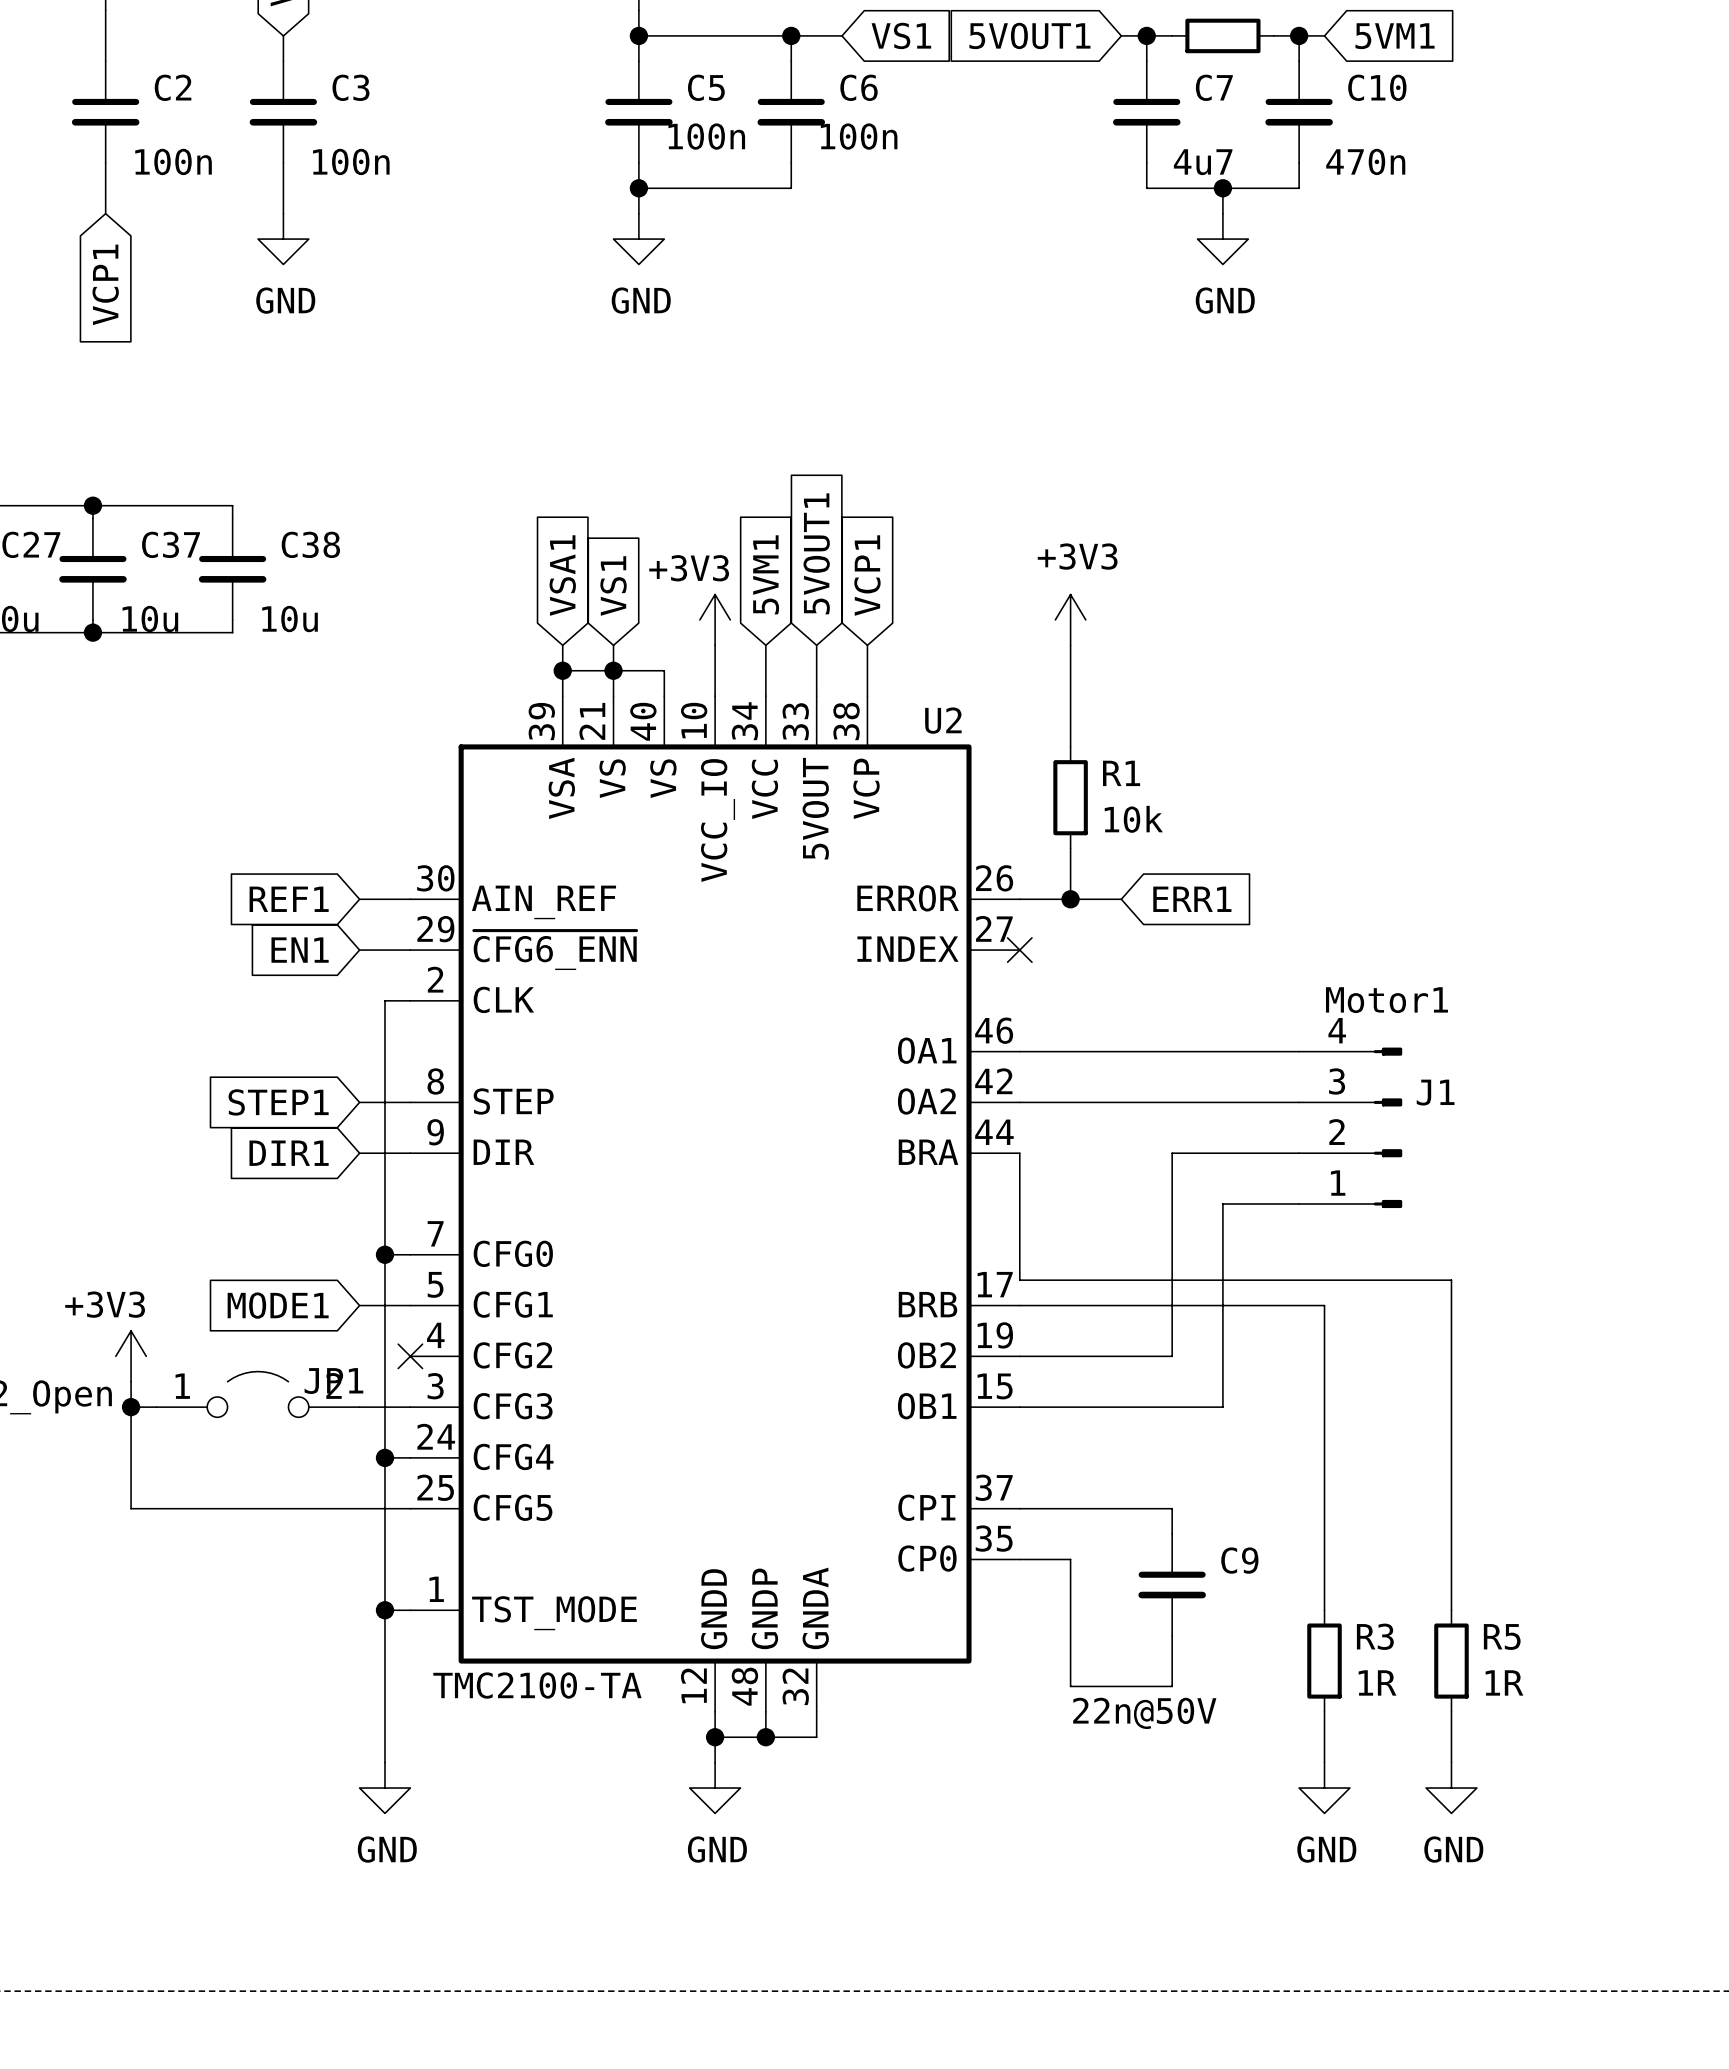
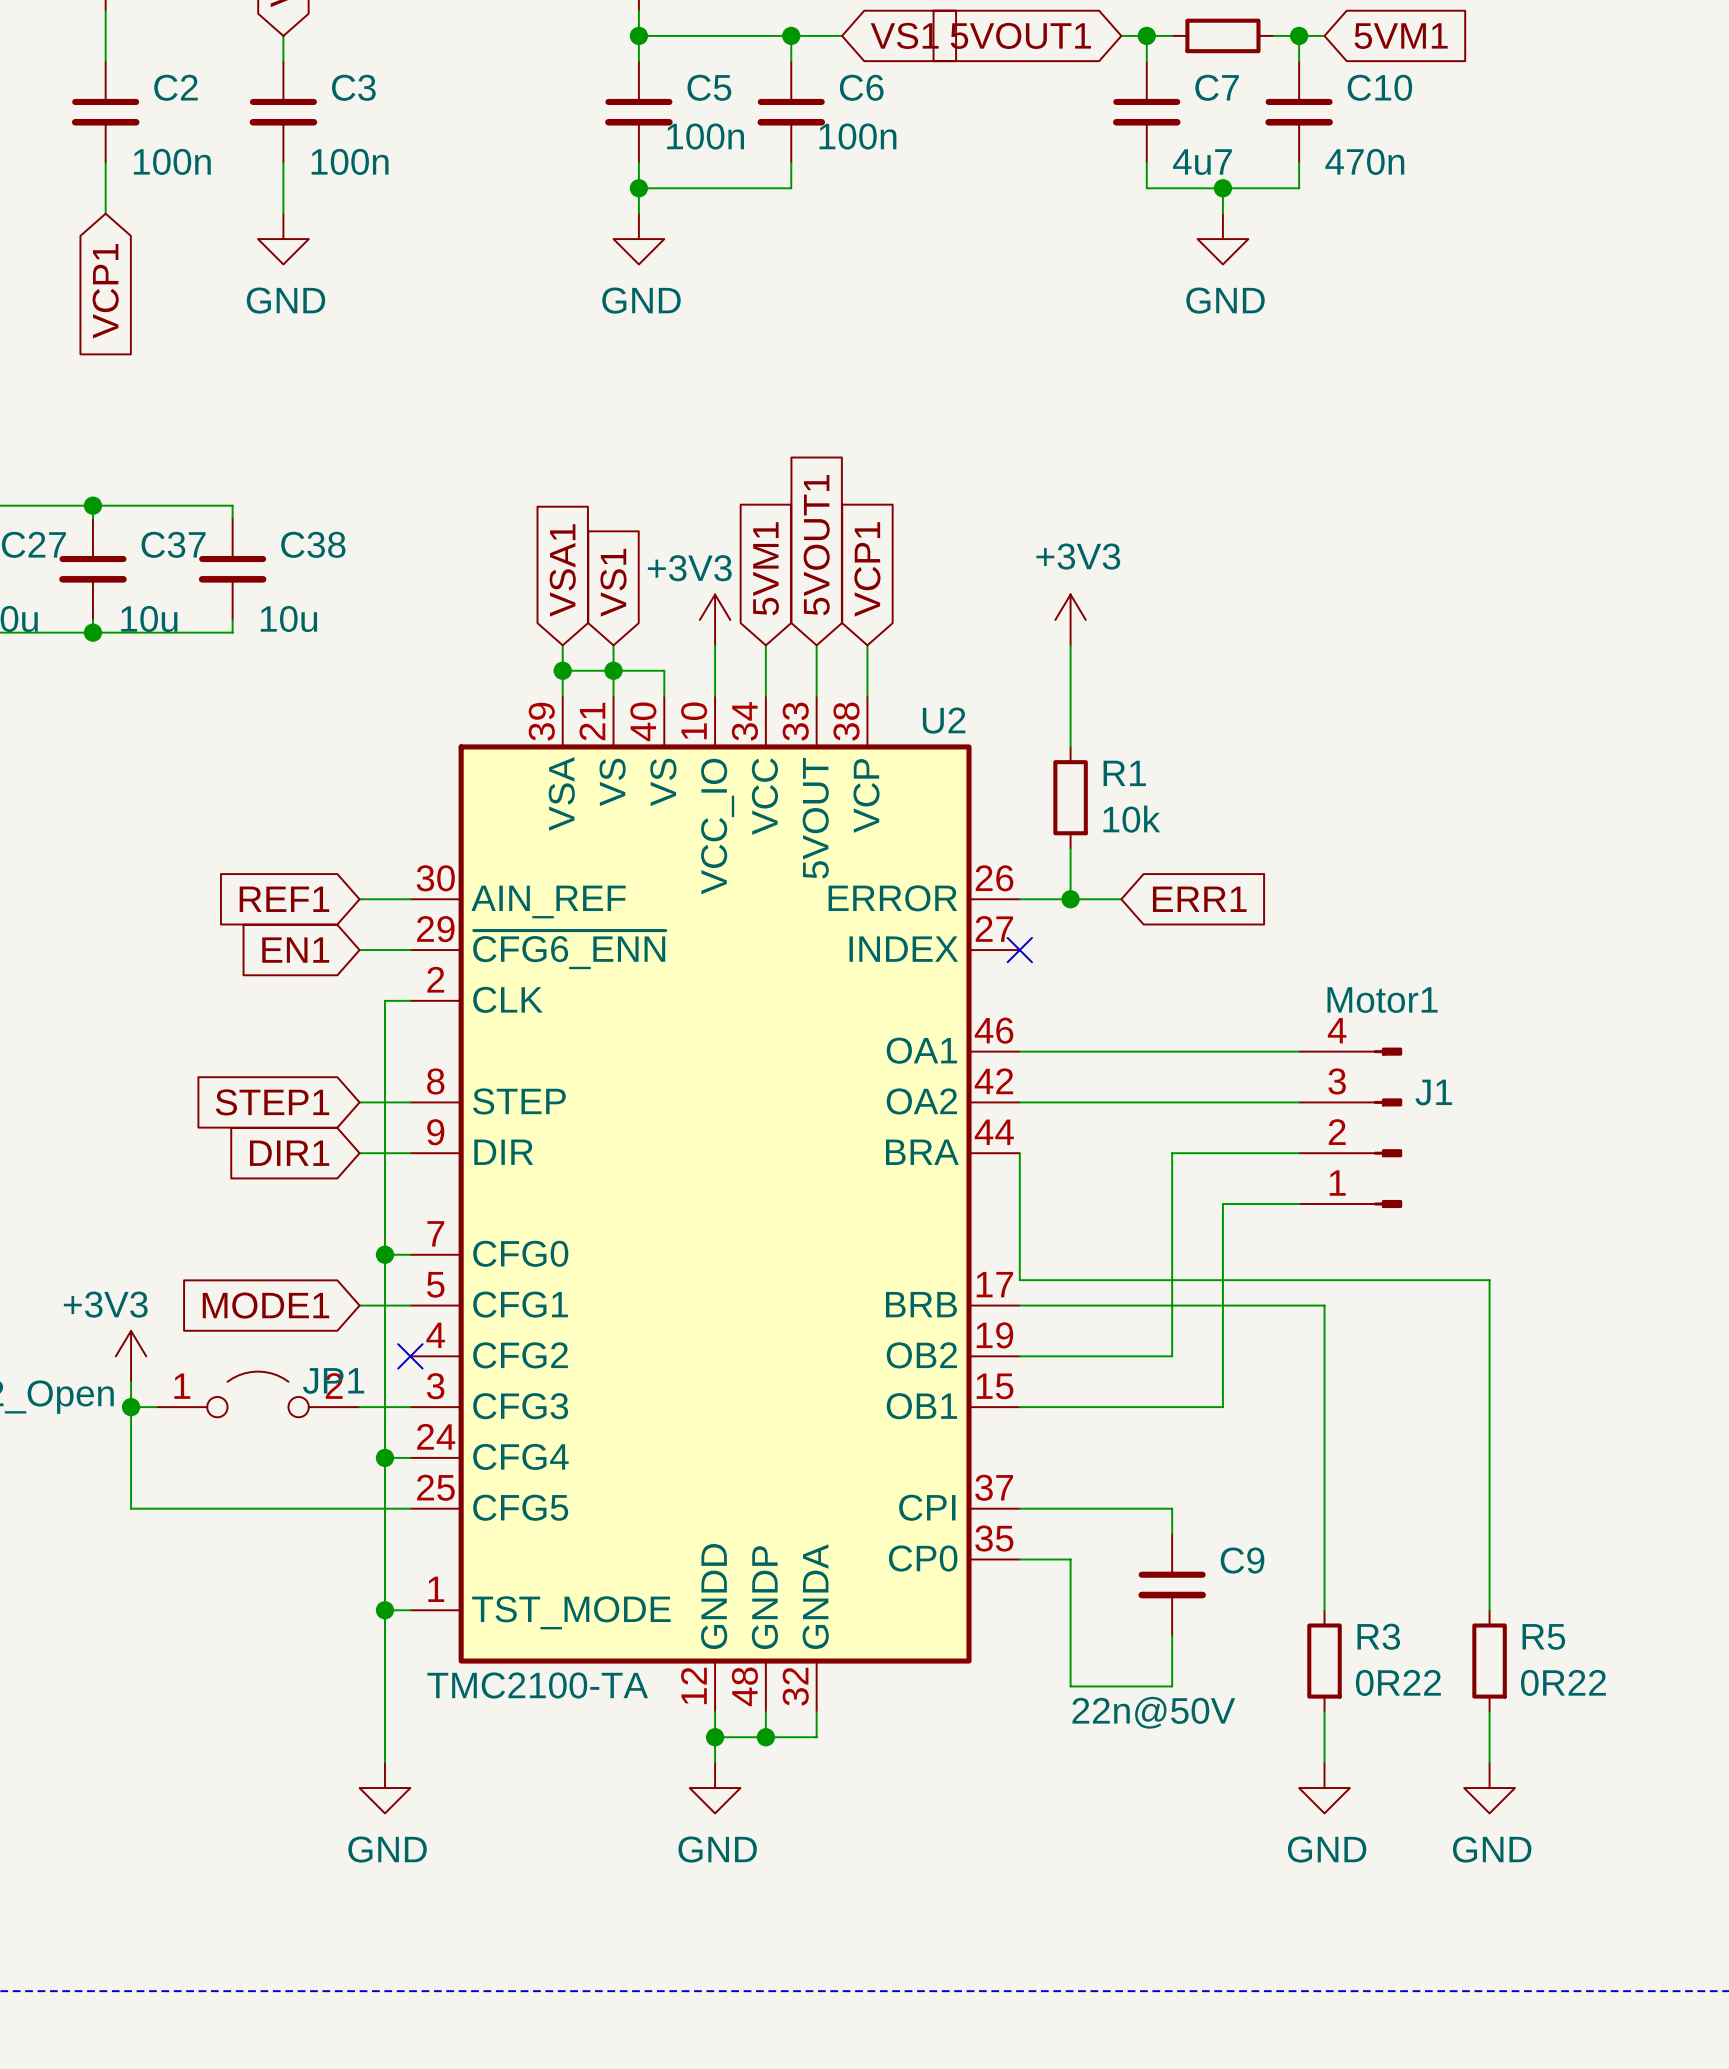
wire: (1451, 1280) (1451, 1610) -> (1451, 1280) (1489, 1280) (1489, 1610)
R5 position: (1451, 1661) -> (1489, 1661)
R3 value: 1R (1377, 1682) -> 0R22 (1398, 1682)
R5 value: 1R (1504, 1682) -> 0R22 (1563, 1682)
wire: (1451, 1711) (1451, 1762) -> (1489, 1711) (1489, 1762)
power symbol position: GND (1451, 1788) -> GND (1489, 1788)

